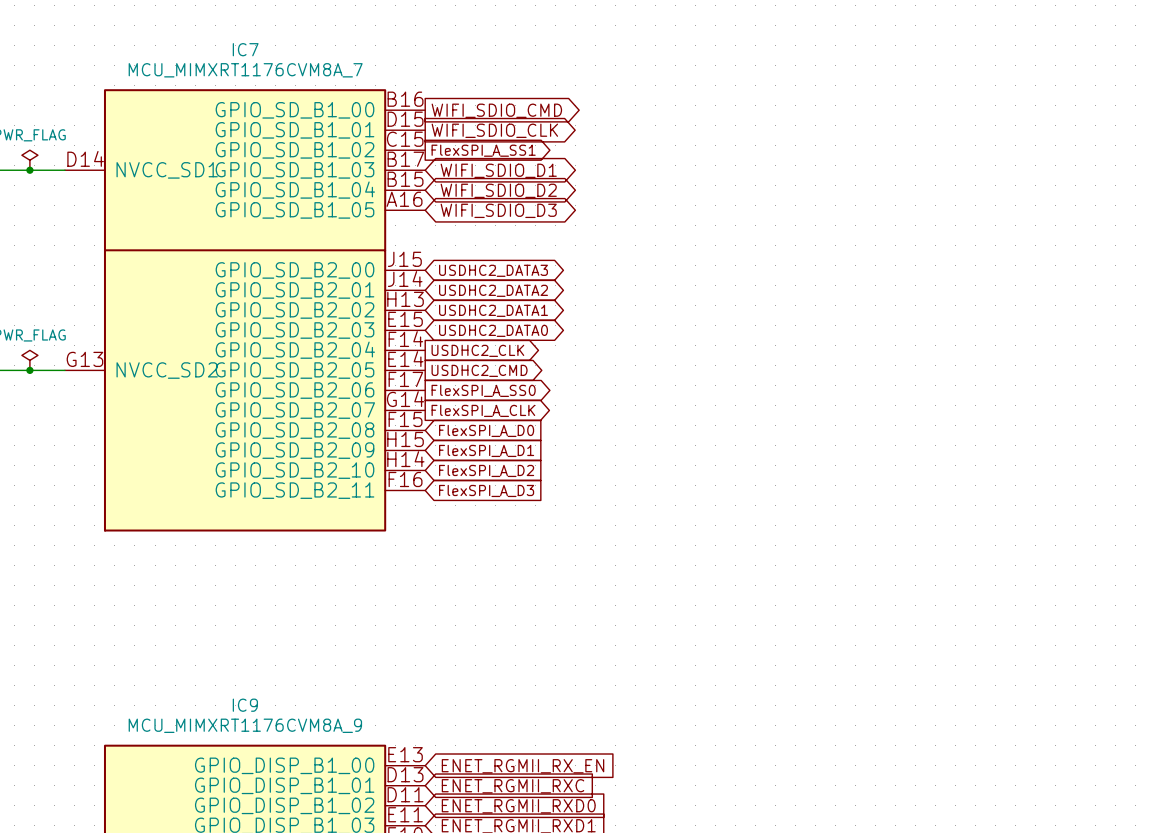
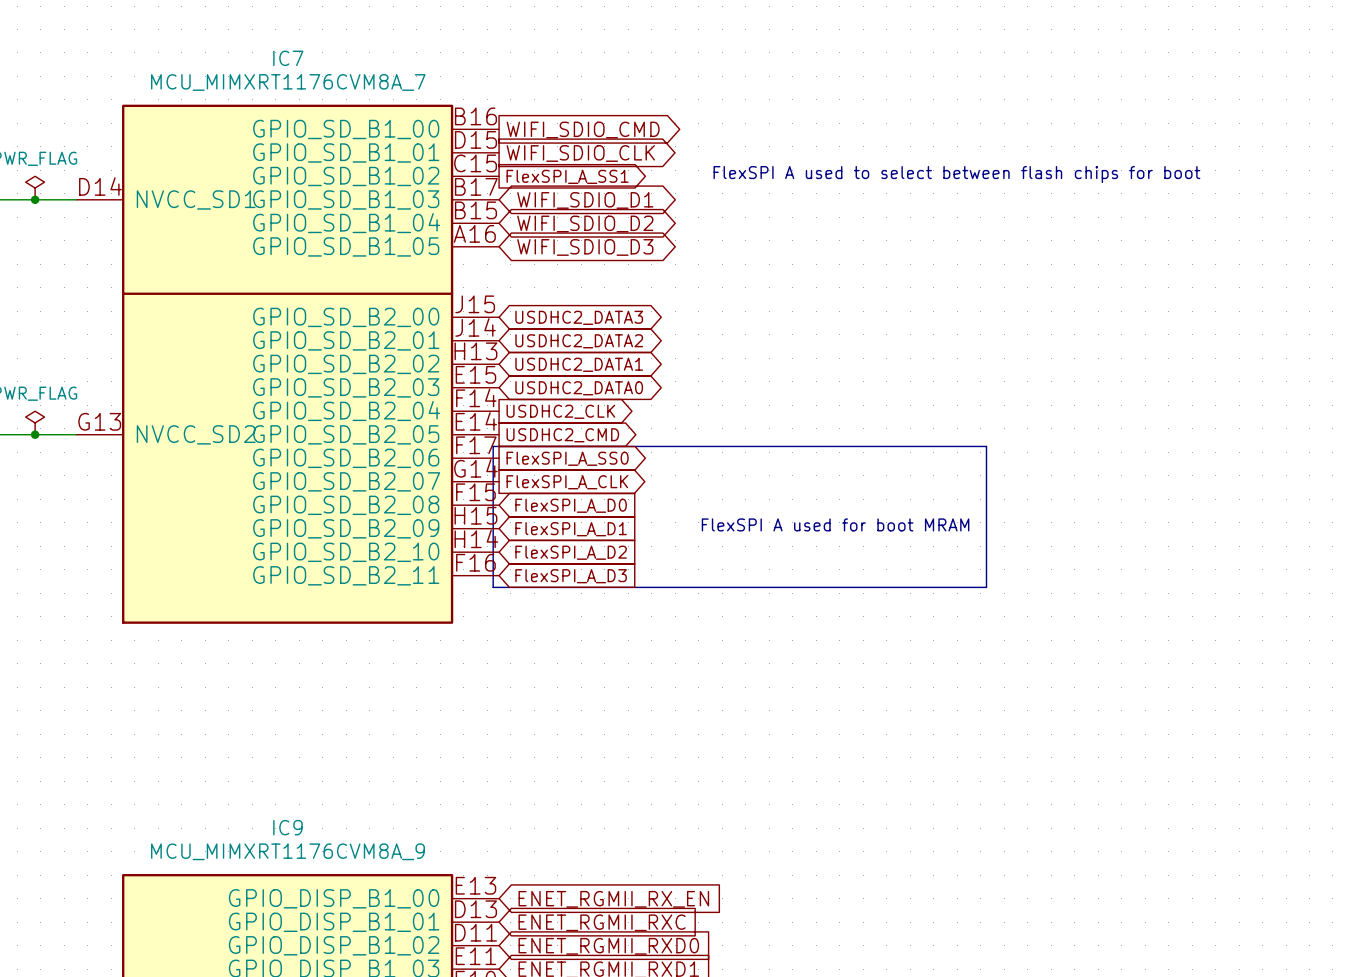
text: none -> FlexSPI A used to select between flash chips for boot (956, 174)
line: none -> (493, 446) (986, 446) (986, 587) (493, 587) (493, 446)
text: none -> FlexSPI A used for boot MRAM (835, 524)

